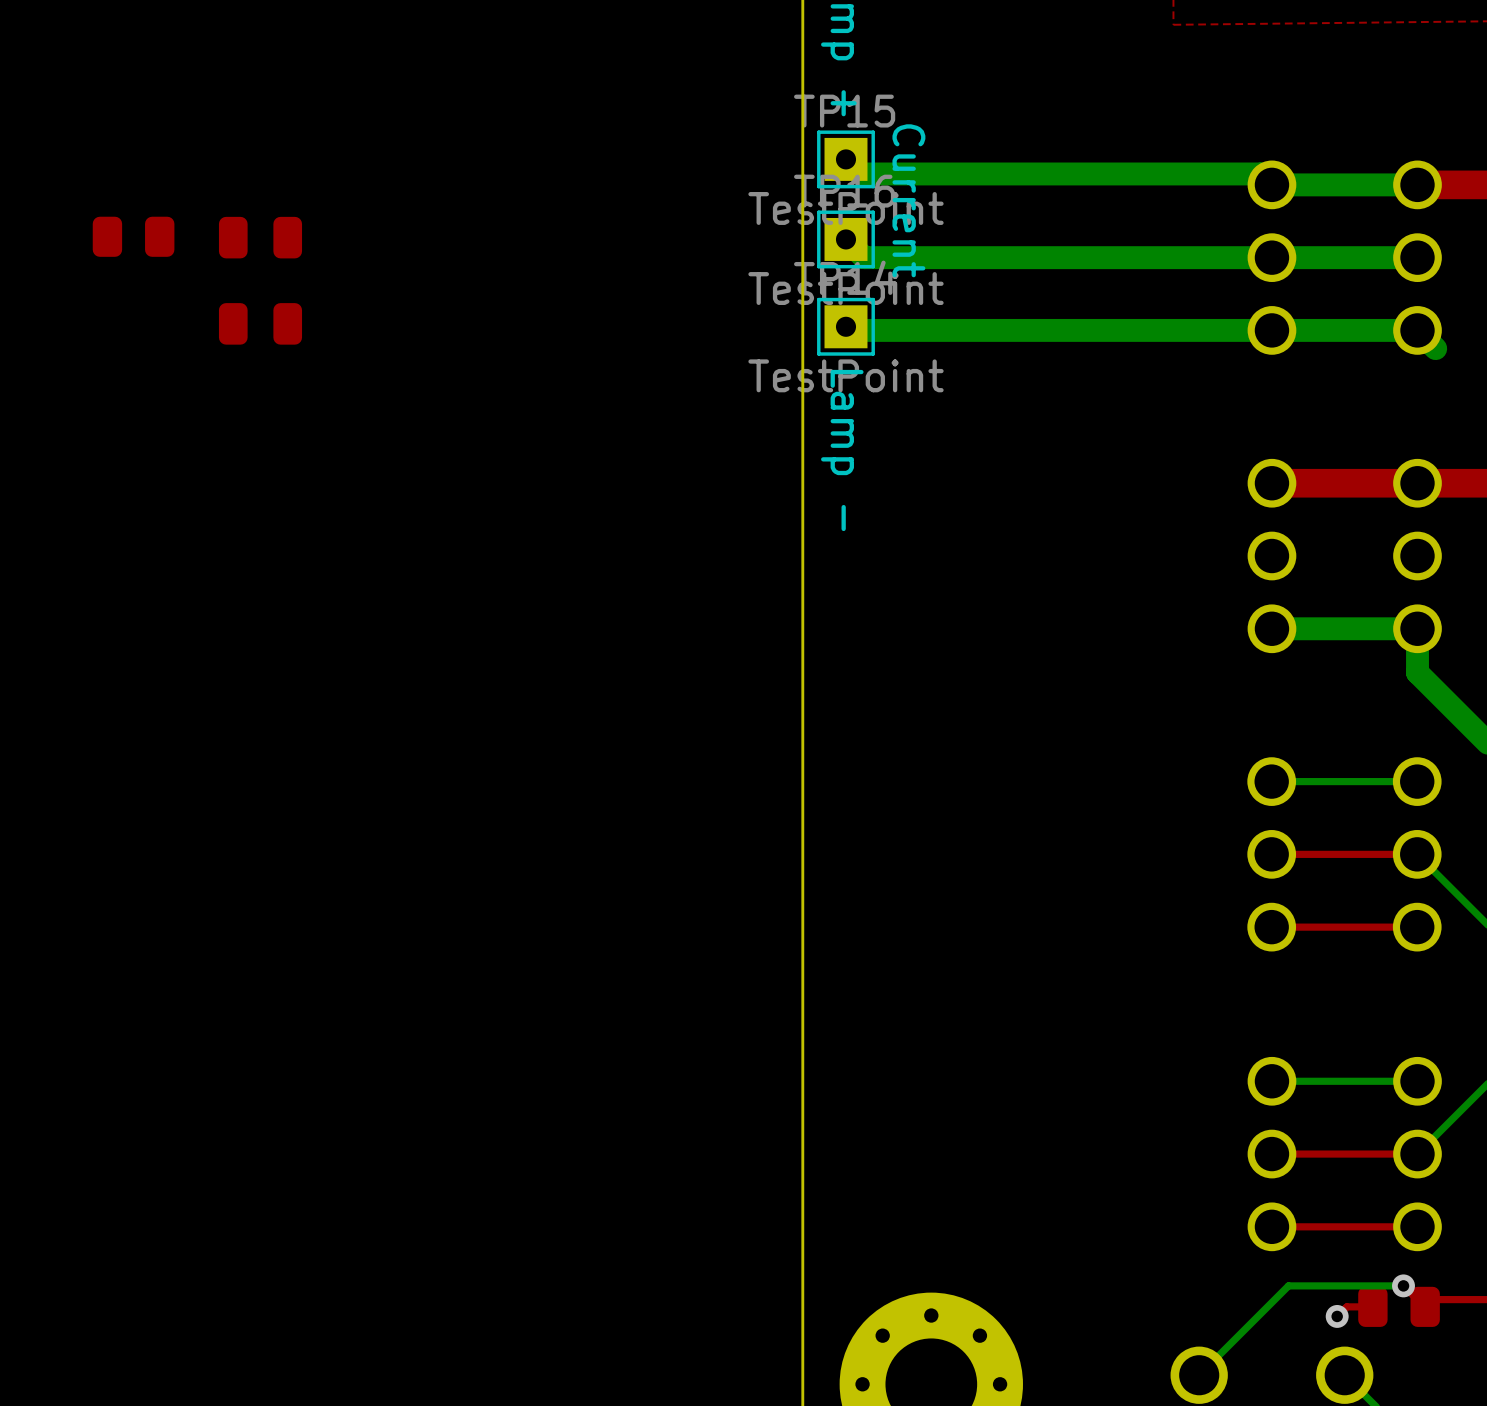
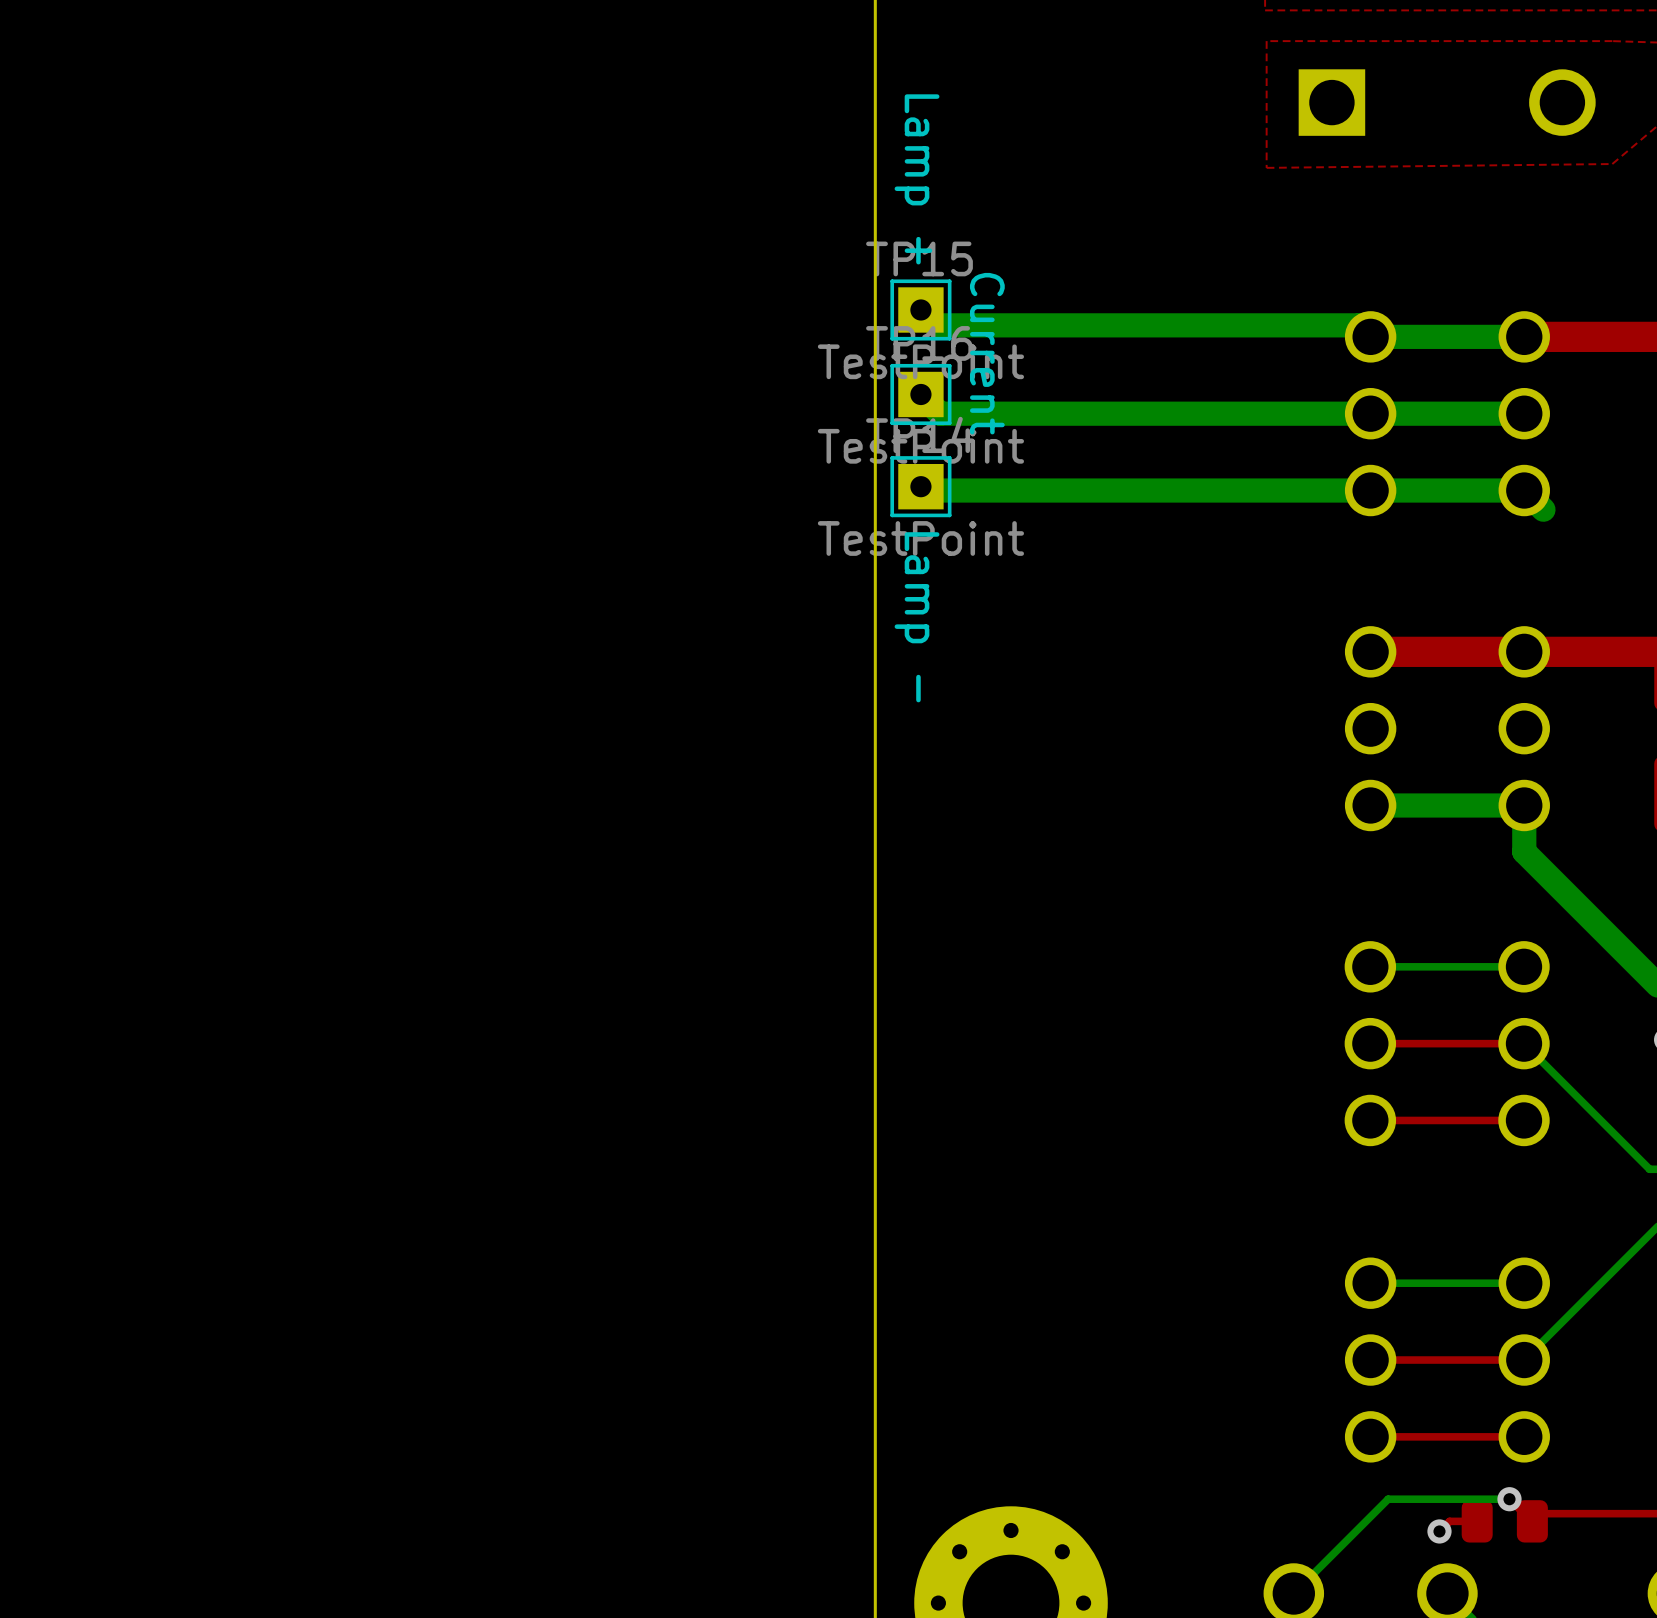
part: (133, 236) -> none
part: (260, 237) -> none
part: (260, 323) -> none

